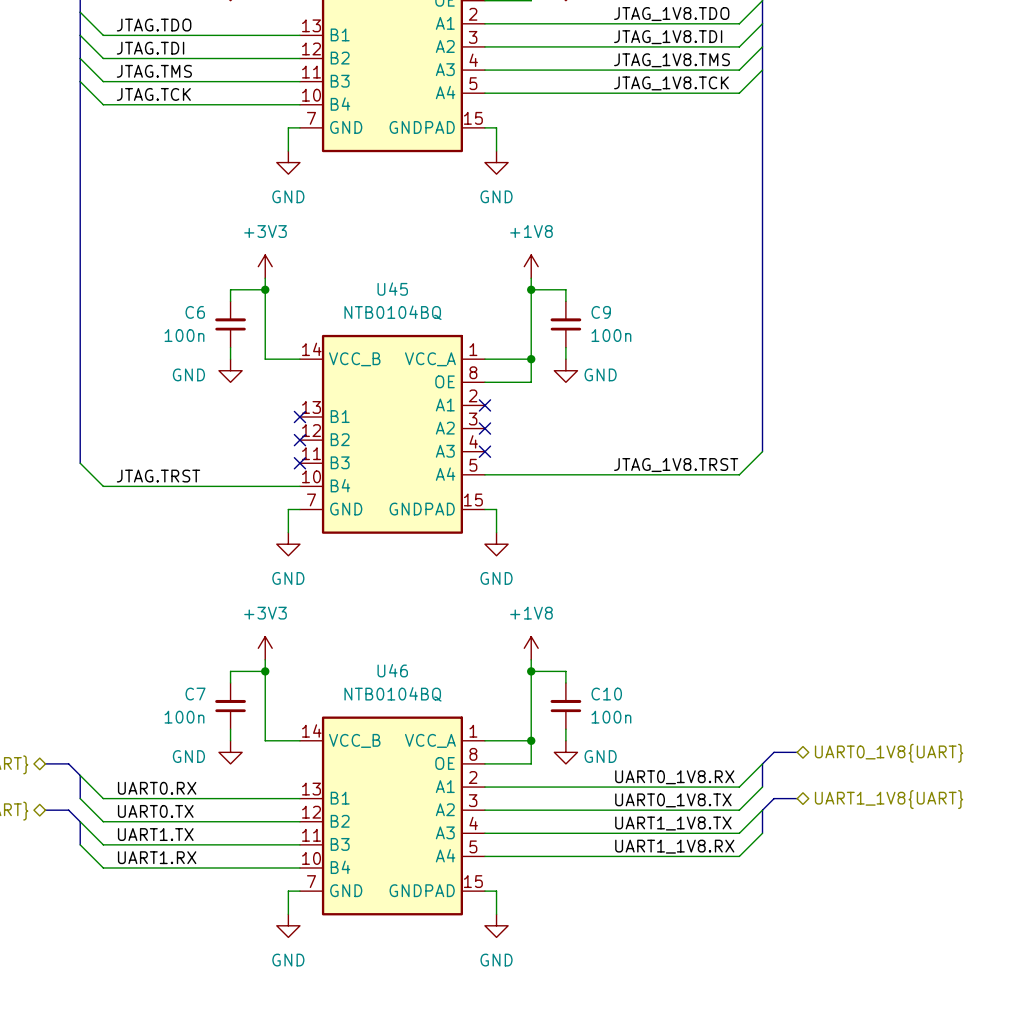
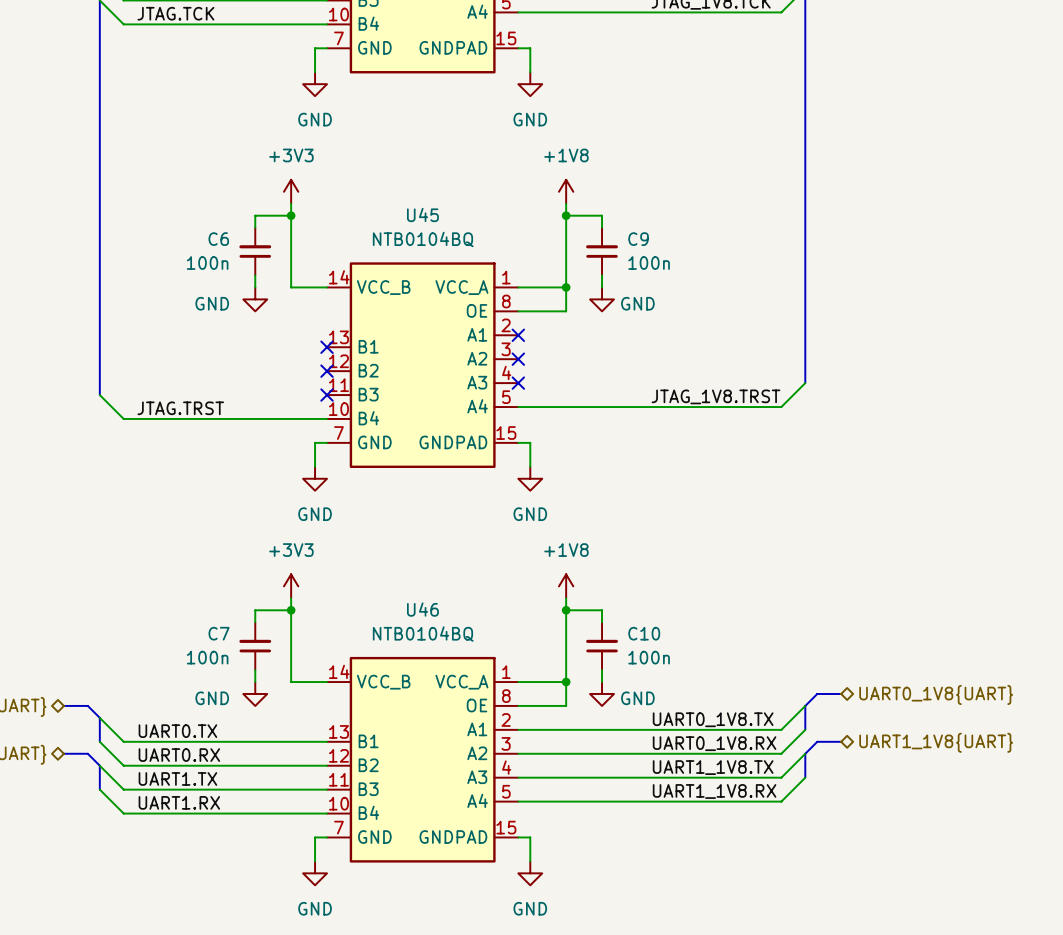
label: UART0_1V8.RX (674, 777) -> UART0_1V8.TX (713, 719)
label: UART0.RX (157, 788) -> UART0.TX (177, 731)
label: UART0_1V8.TX (673, 800) -> UART0_1V8.RX (714, 743)
label: UART0.TX (155, 811) -> UART0.RX (179, 755)

